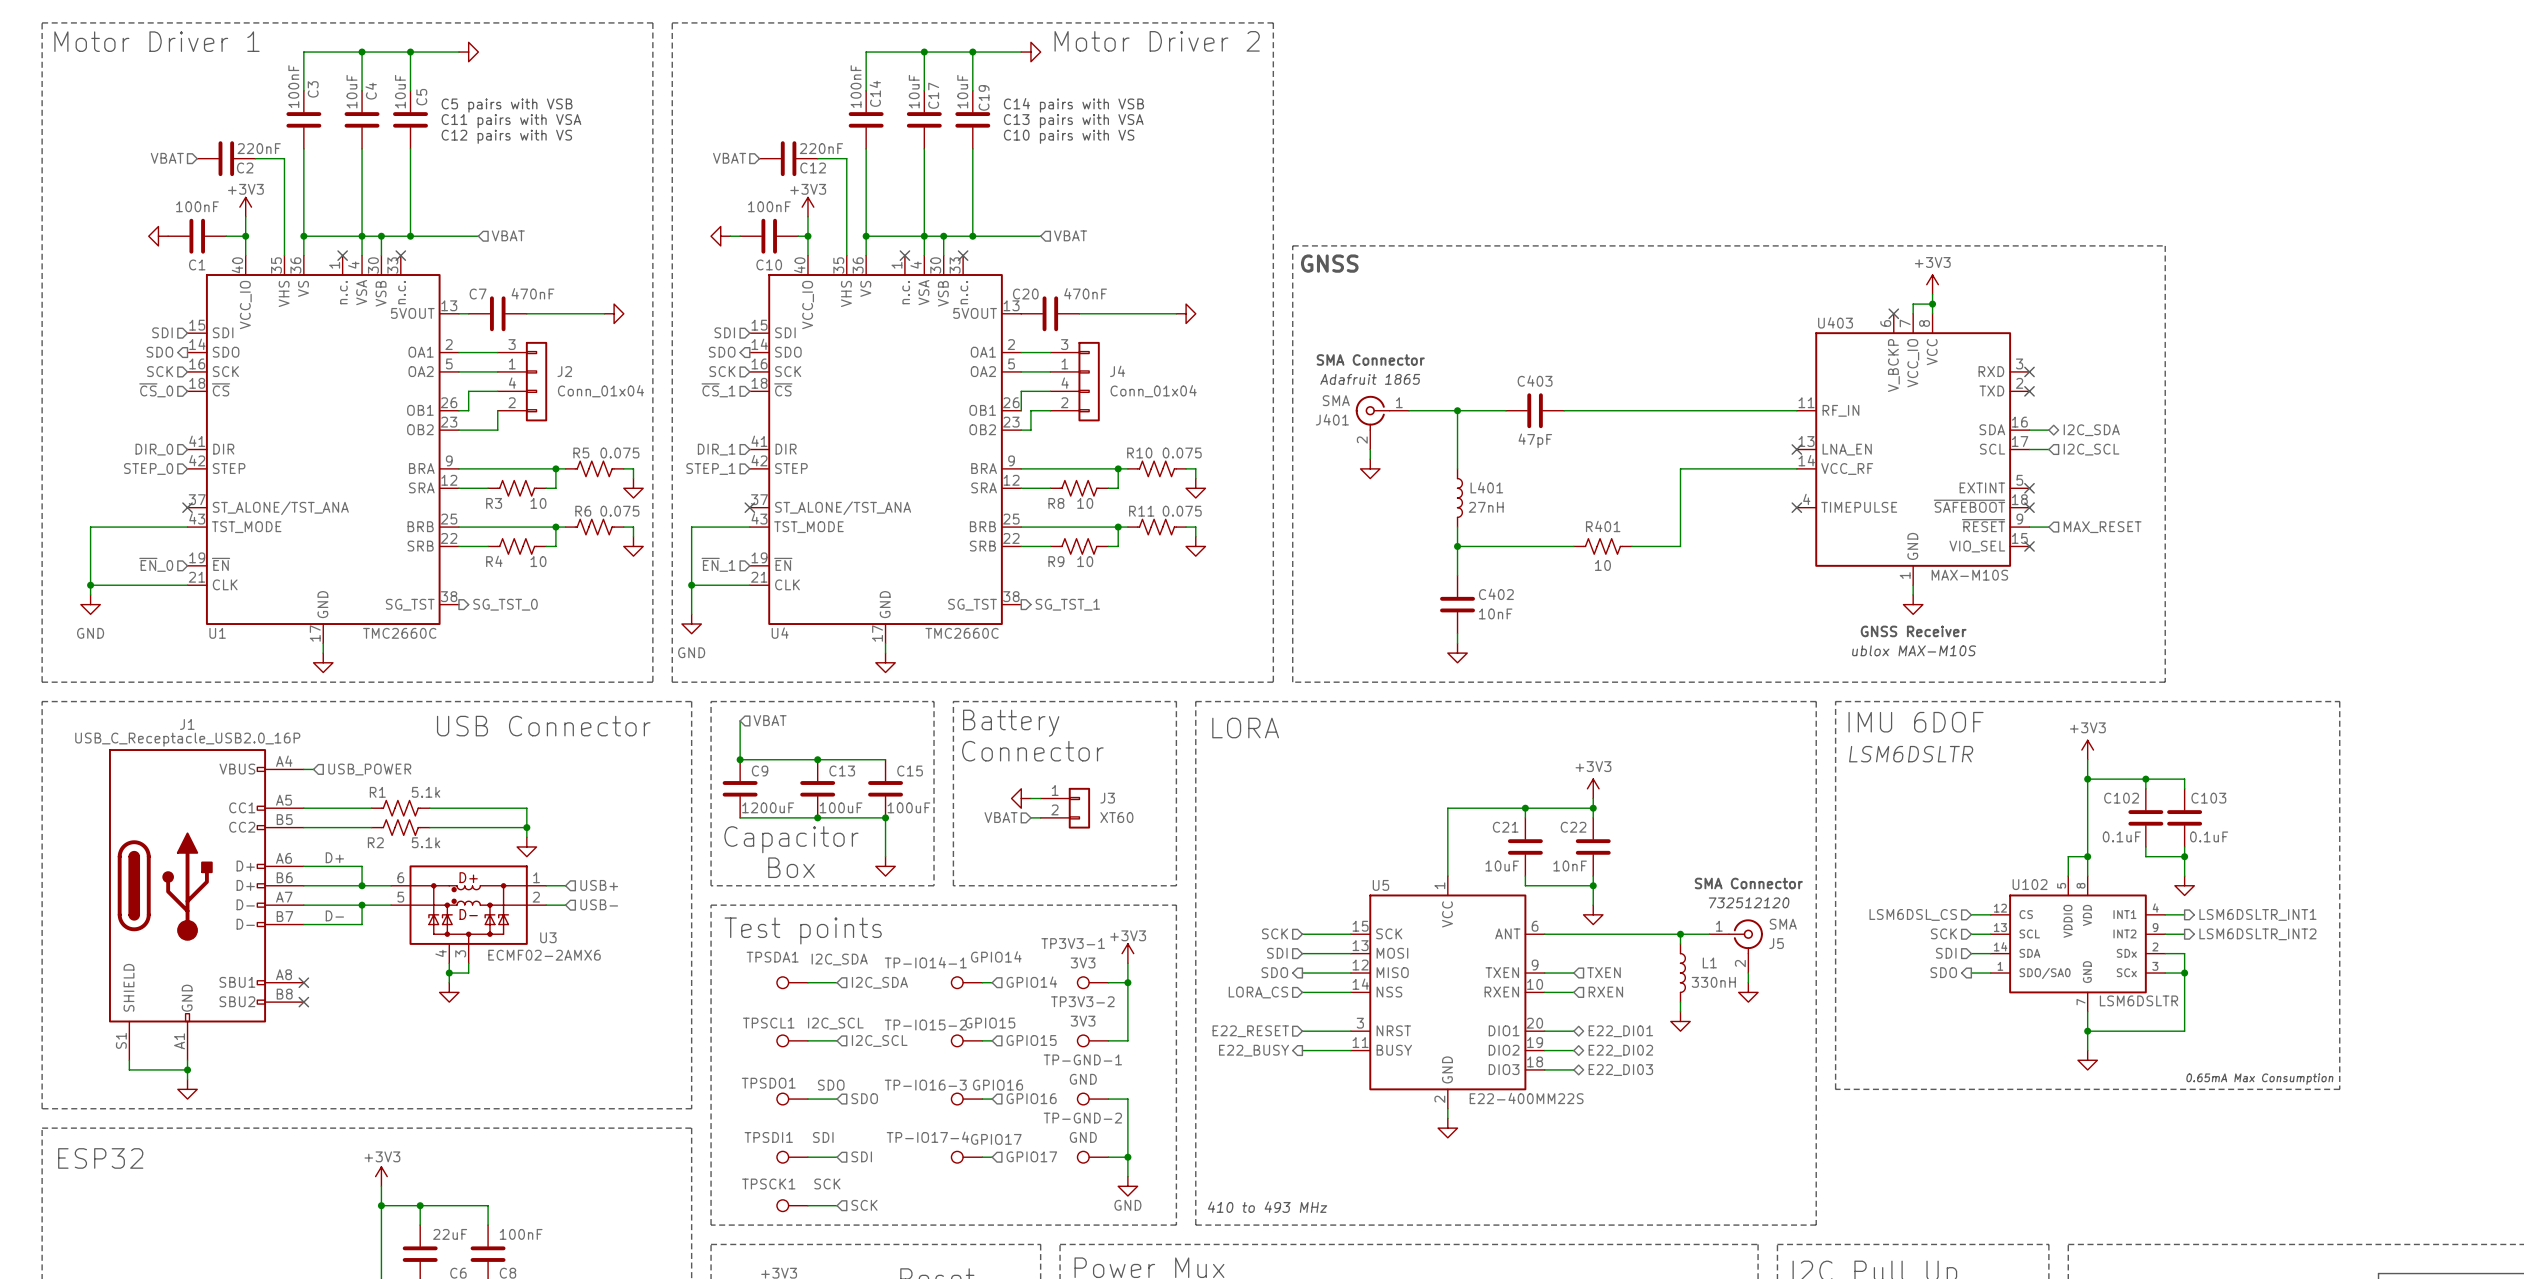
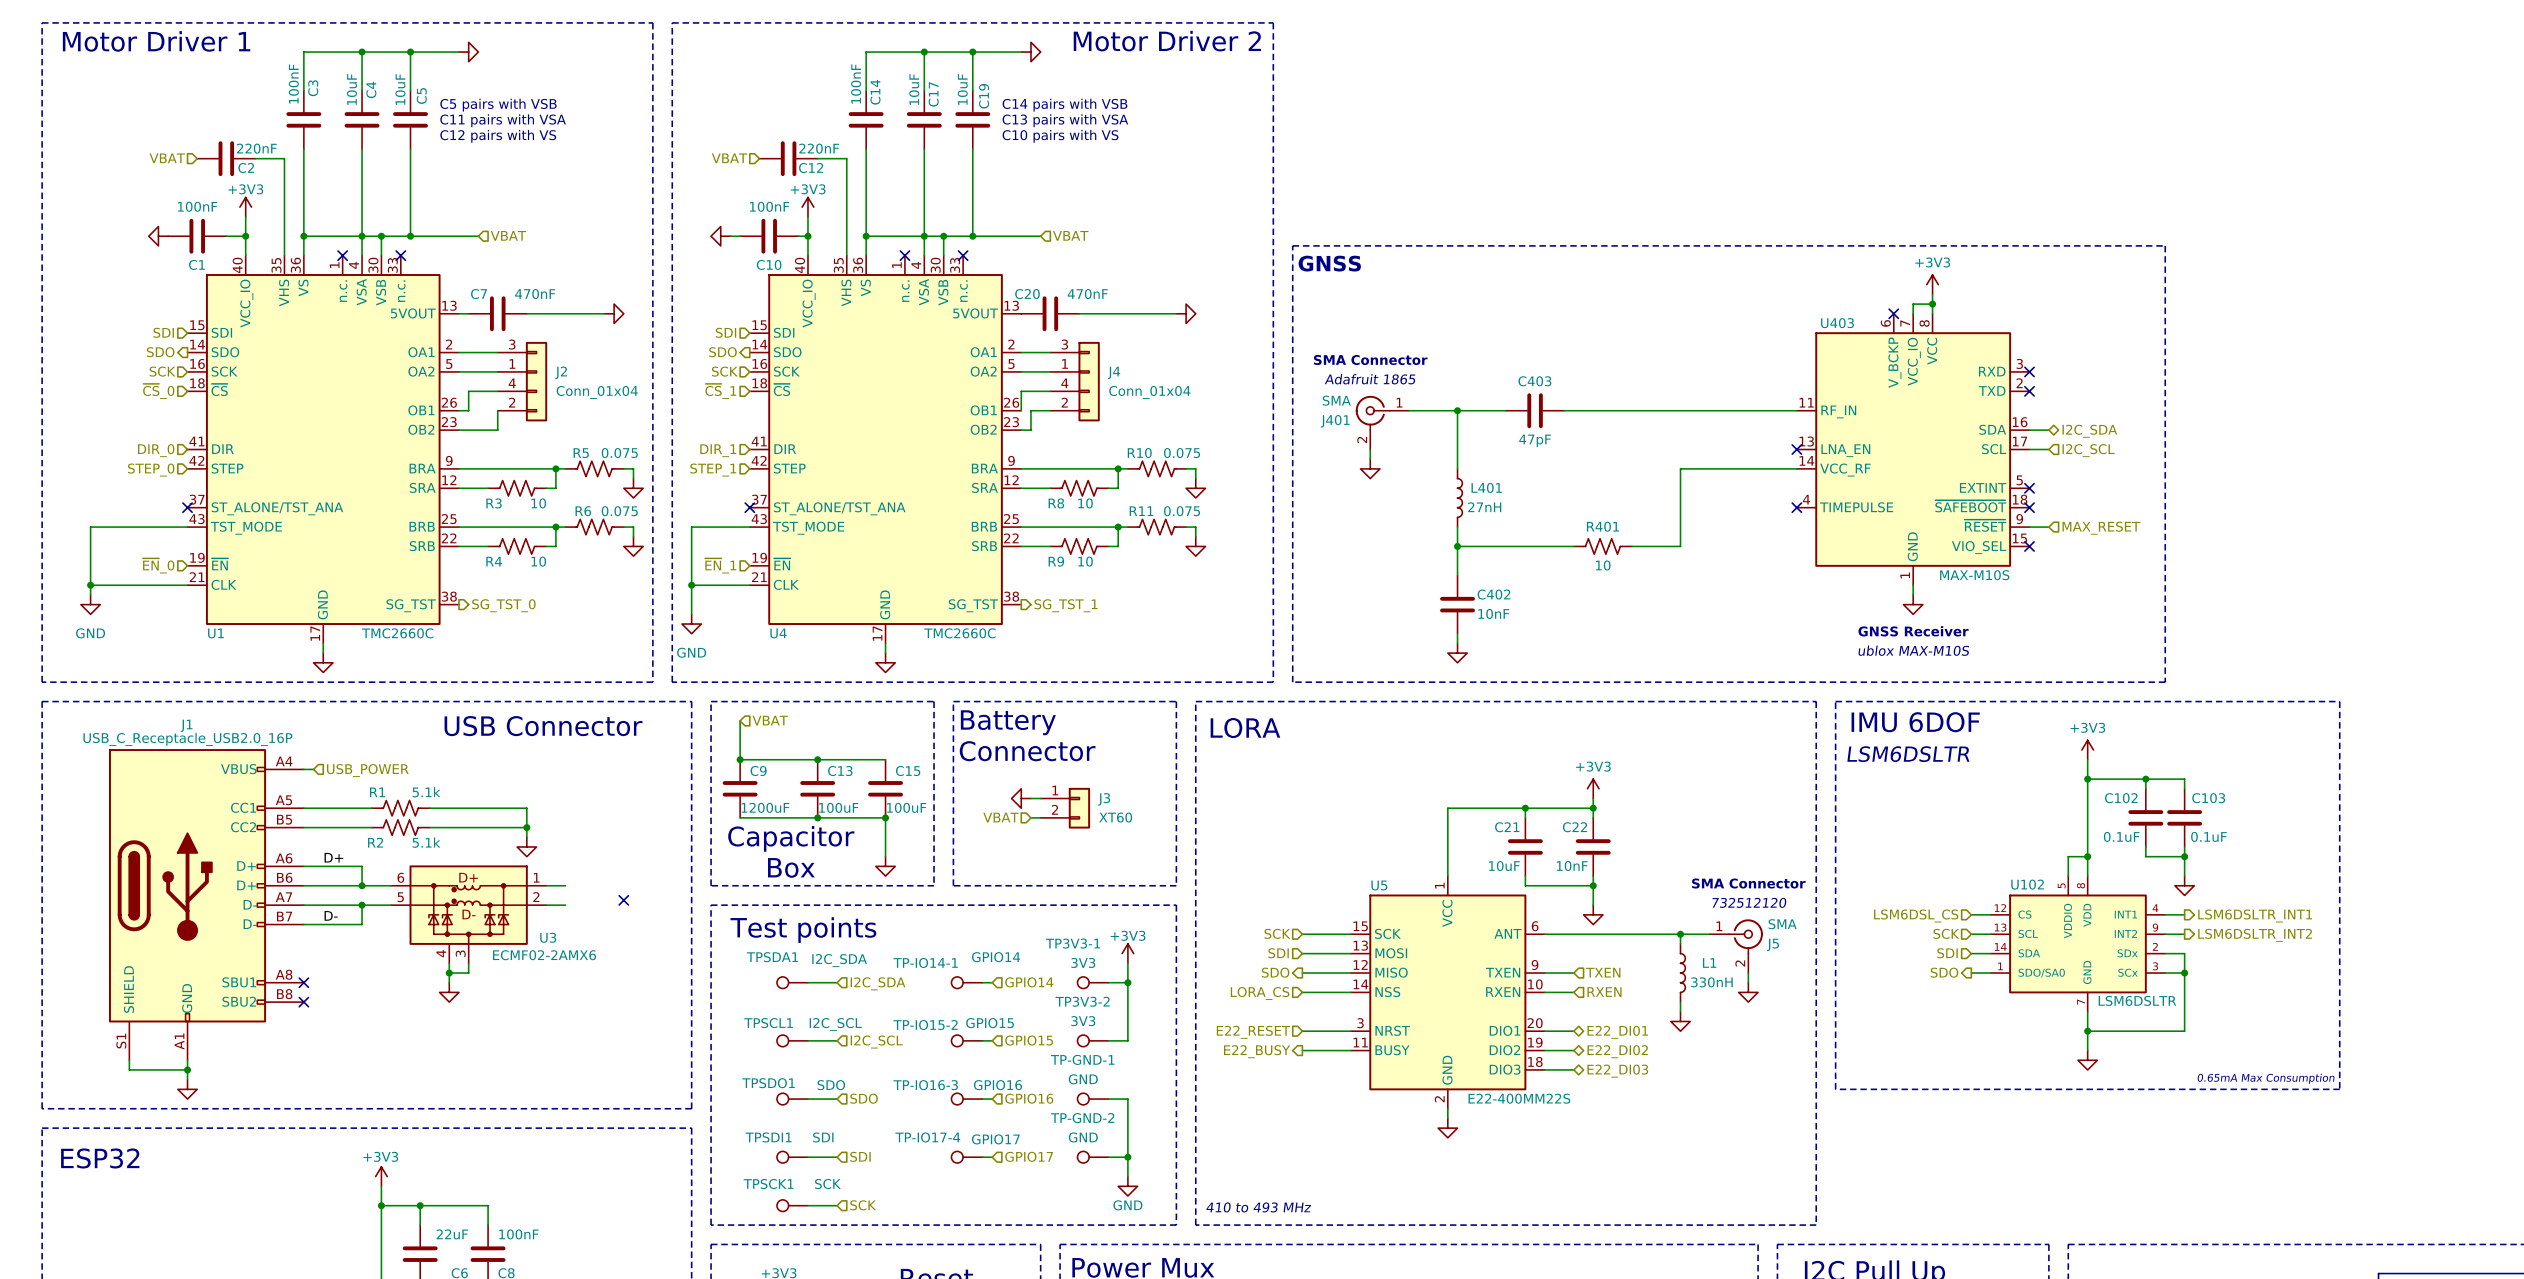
hierarchical label: USB+ (599, 885) -> none
no-connect mark: none -> (623, 900)
hierarchical label: USB- (599, 904) -> none

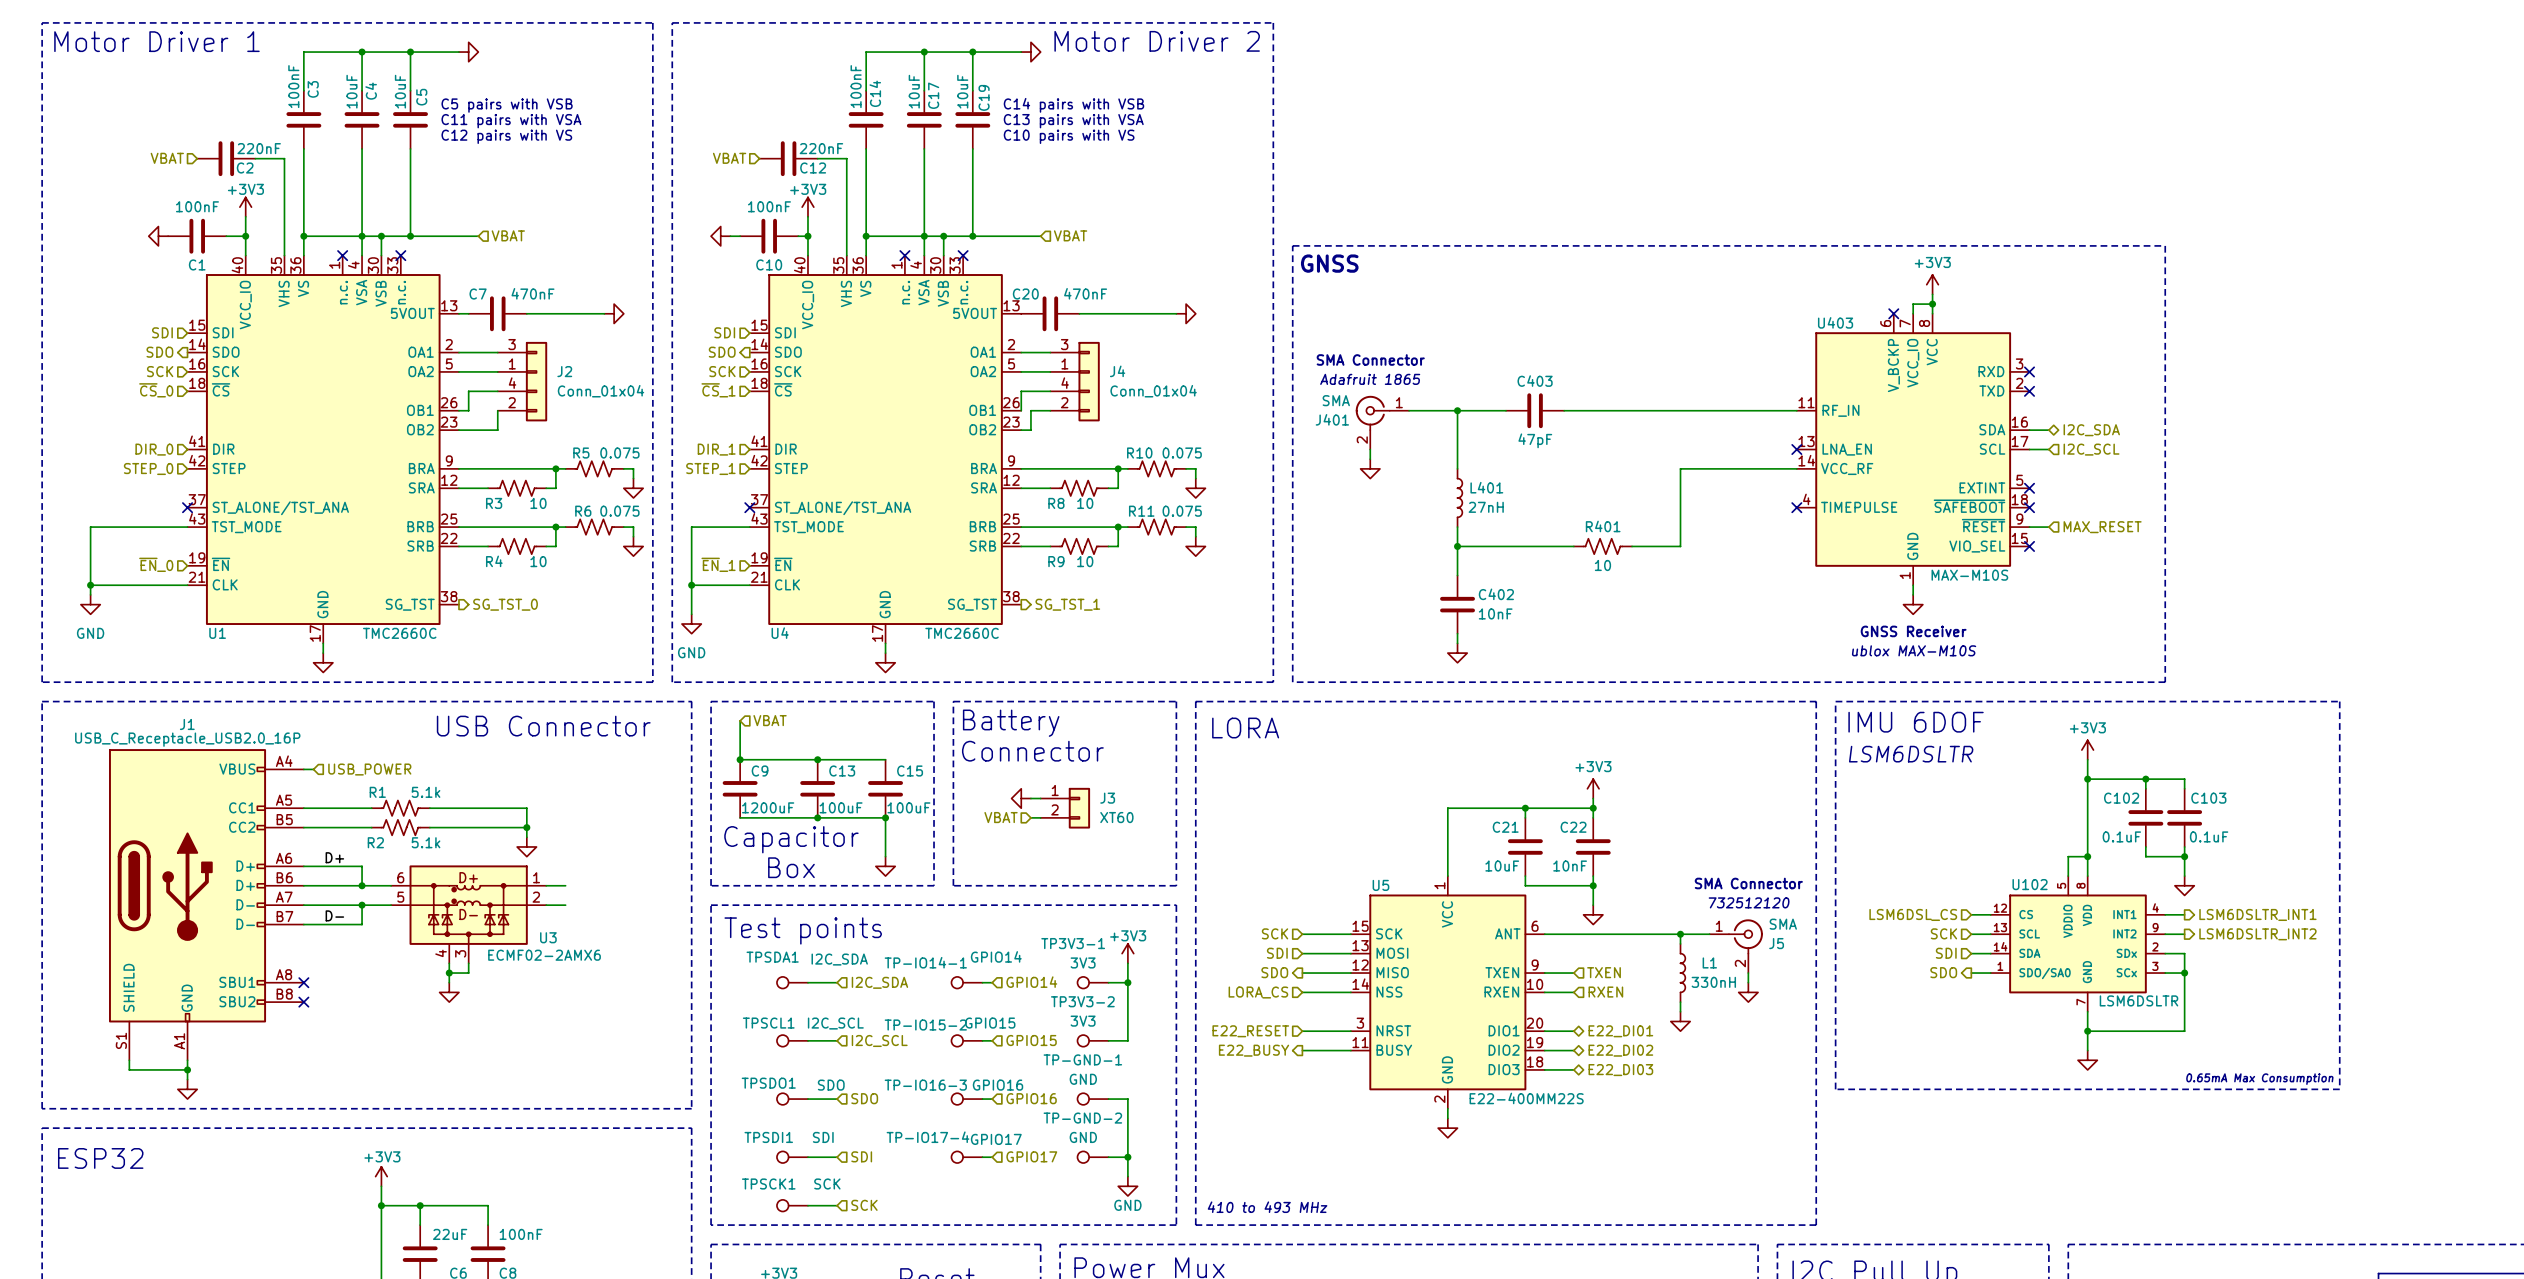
no-connect mark: (623, 900) -> none

